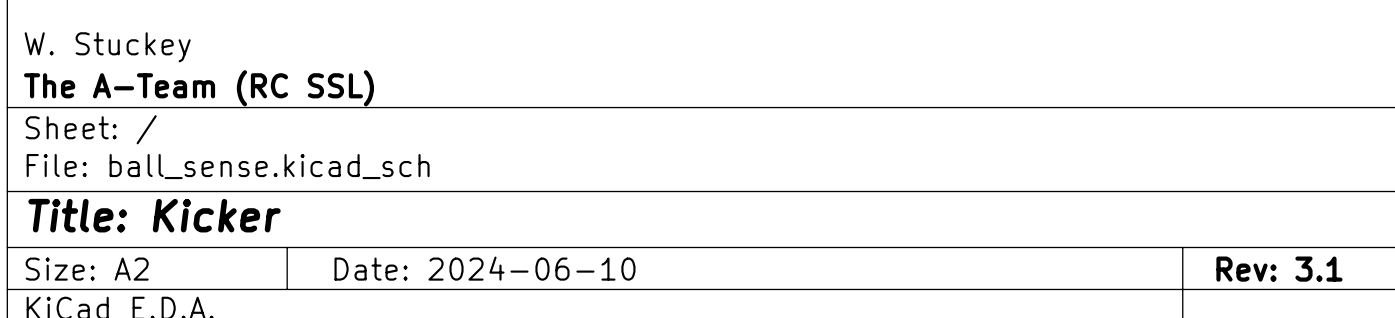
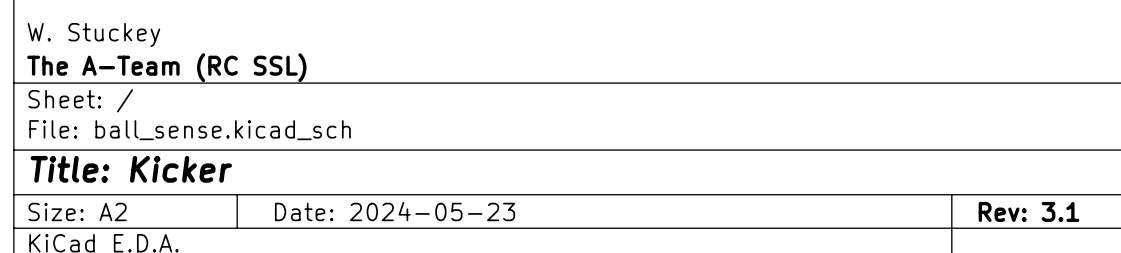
title block: Date: 2024-06-10 (484, 268) -> Date: 2024-05-23 (395, 211)

